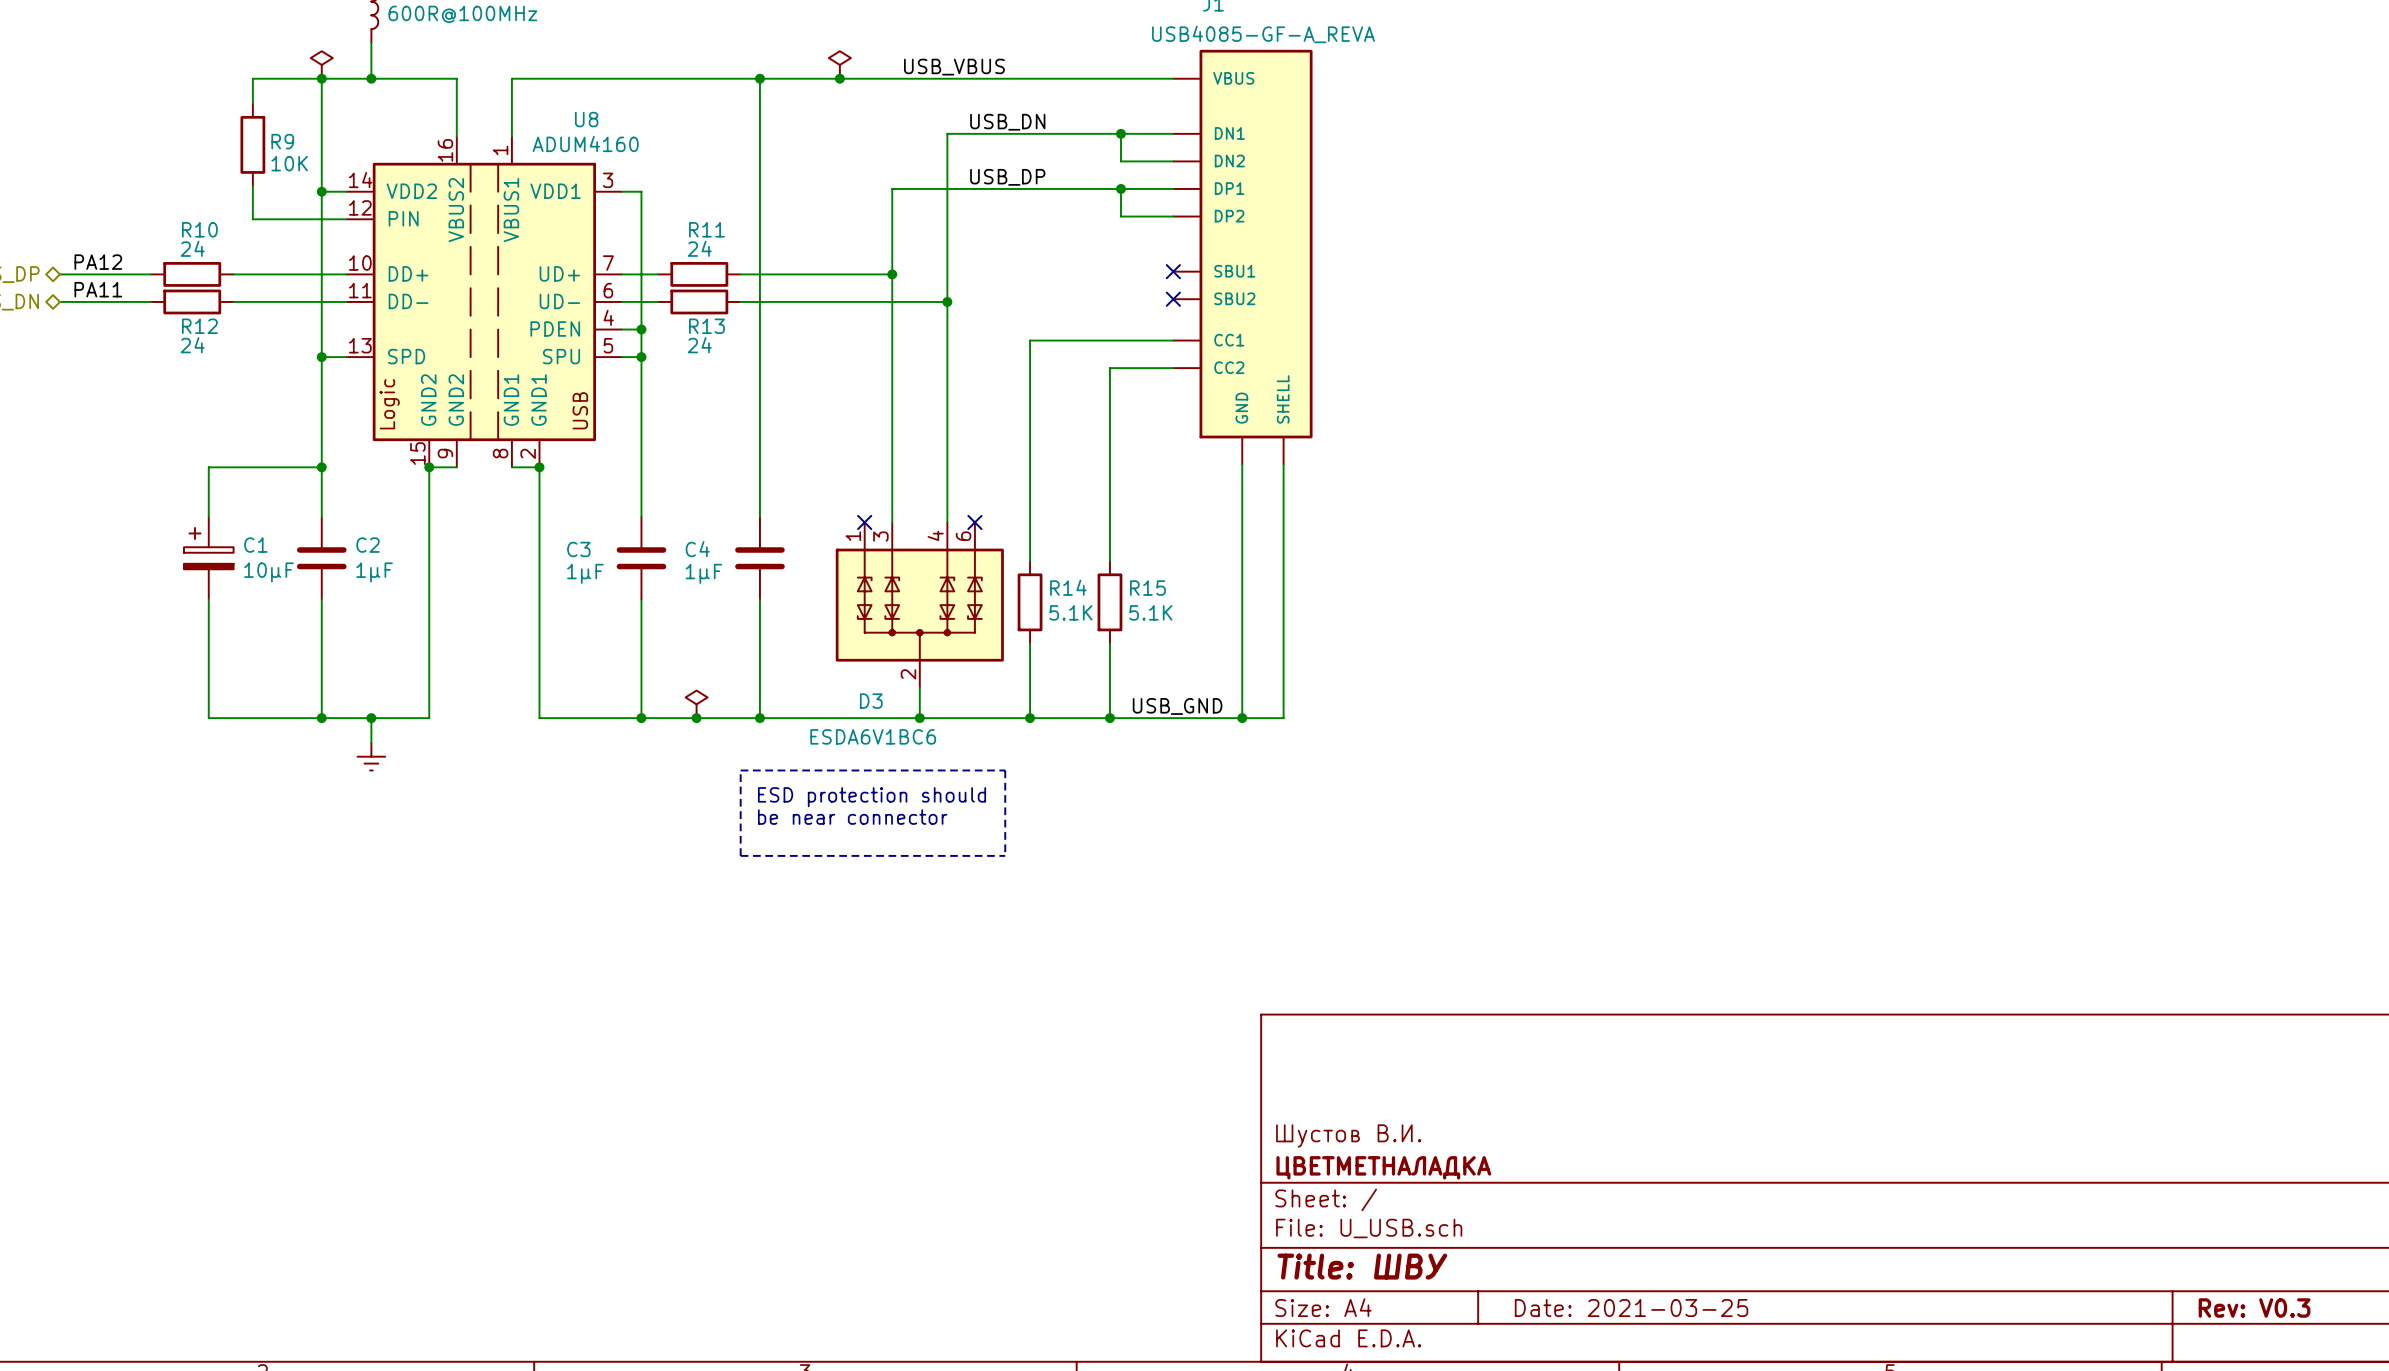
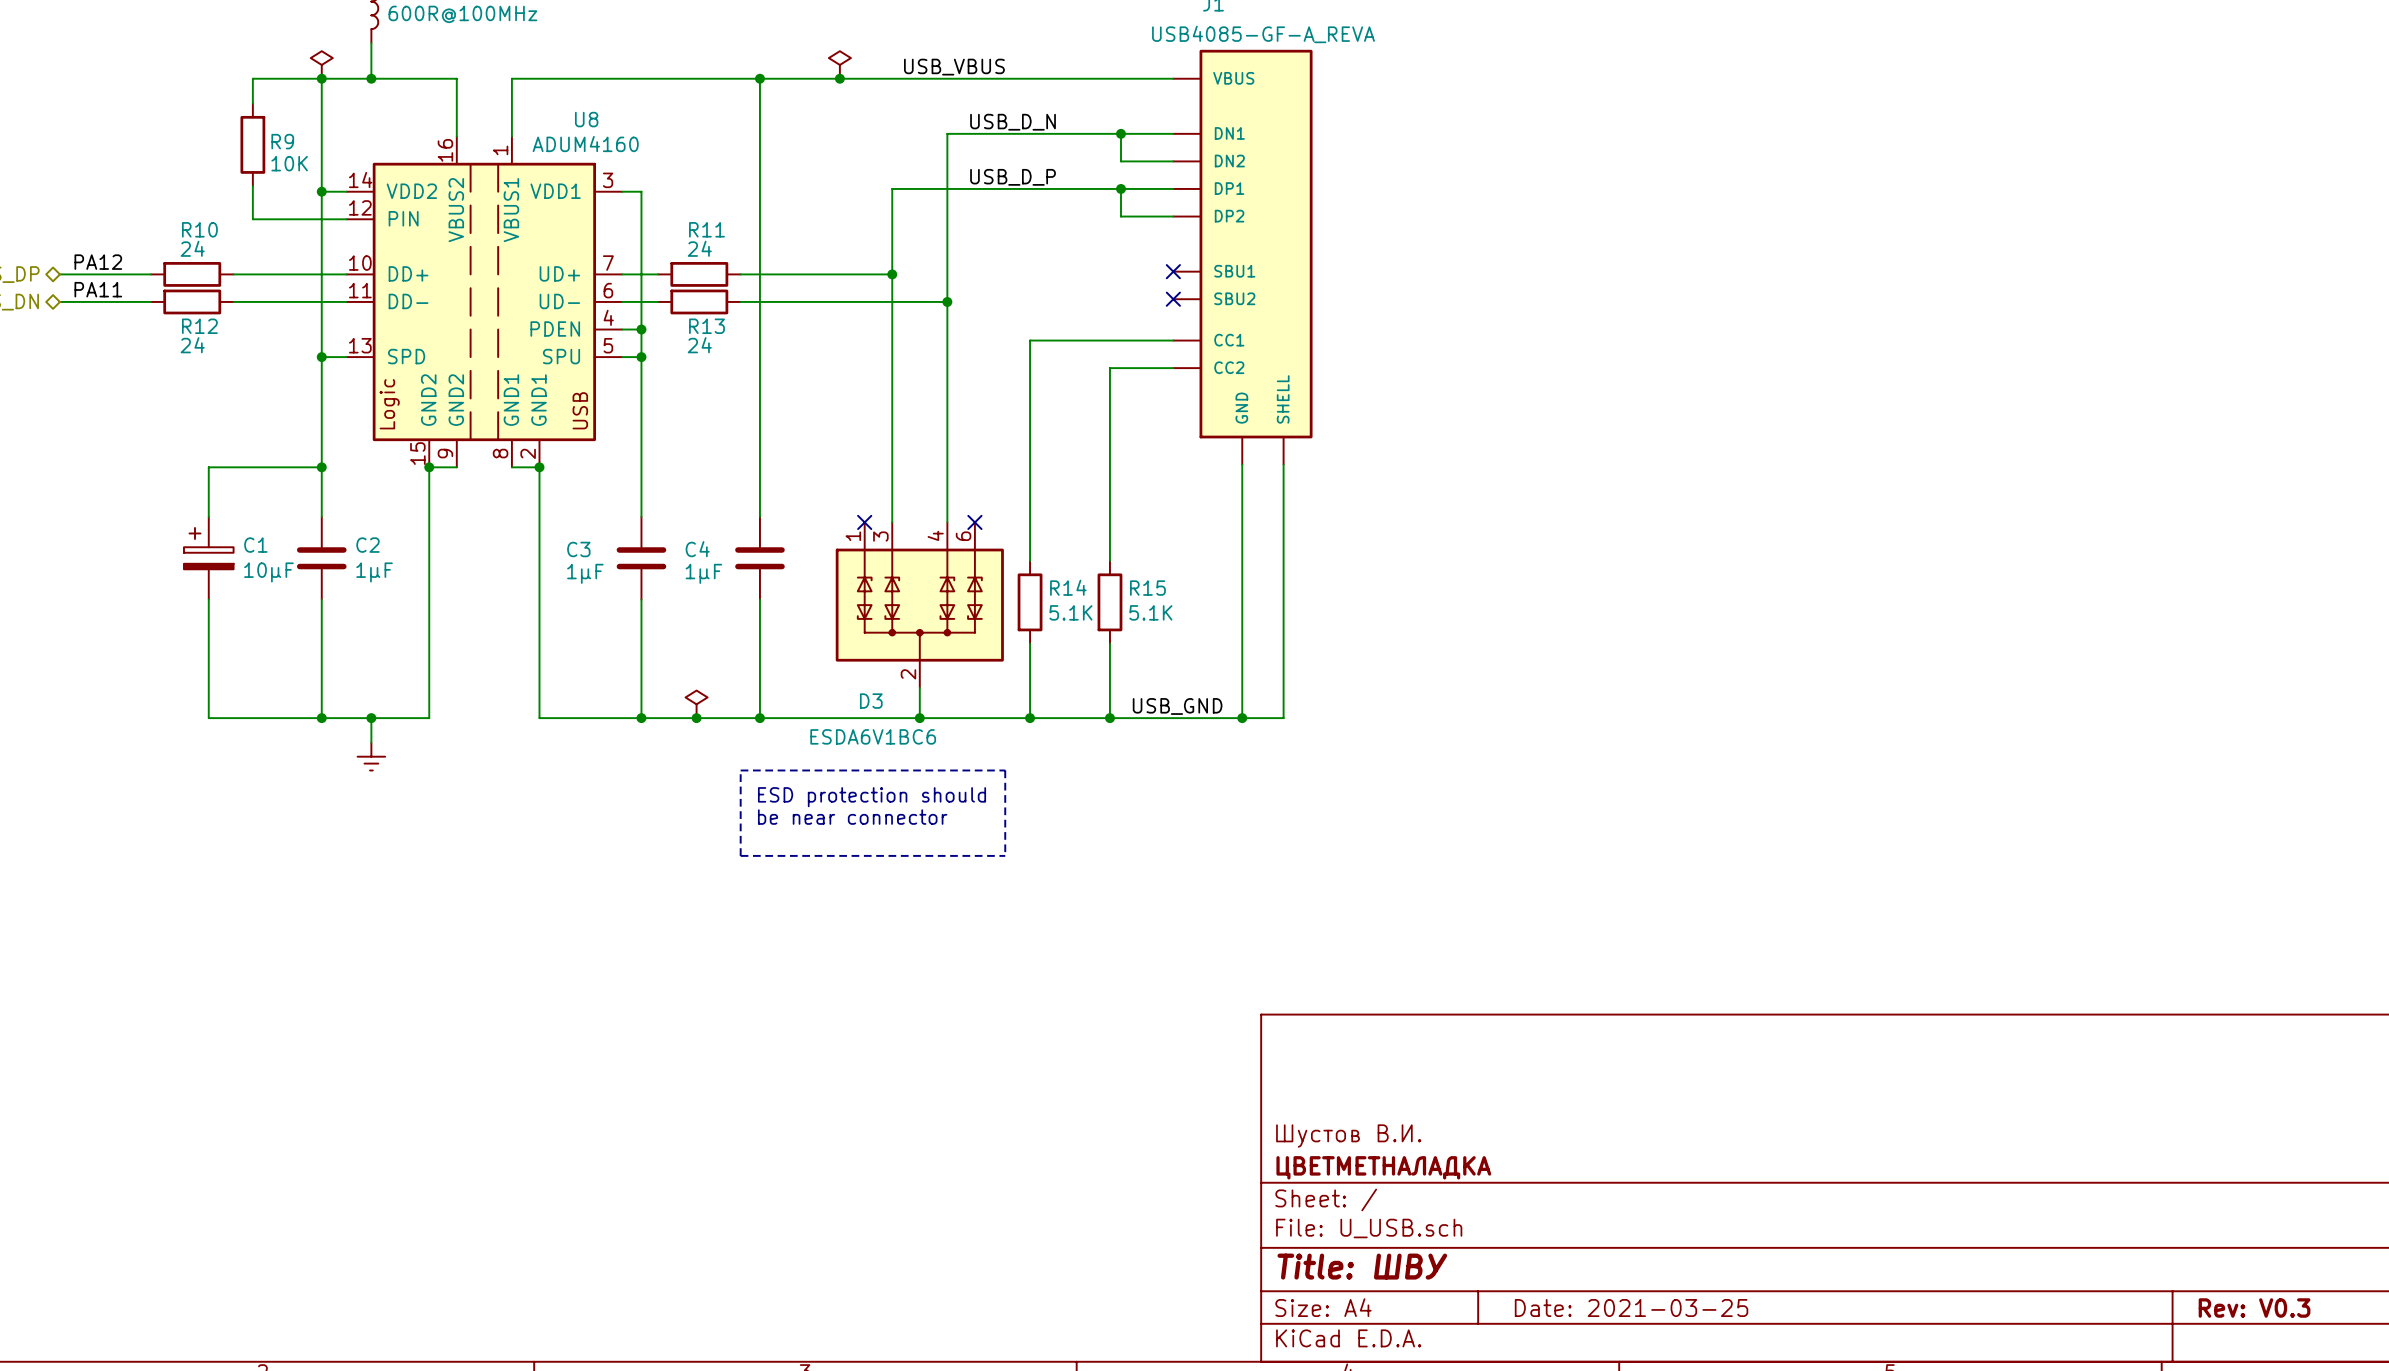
label: USB_DN (1007, 122) -> USB_D_N (1013, 122)
label: USB_DP (1007, 177) -> USB_D_P (1013, 177)

